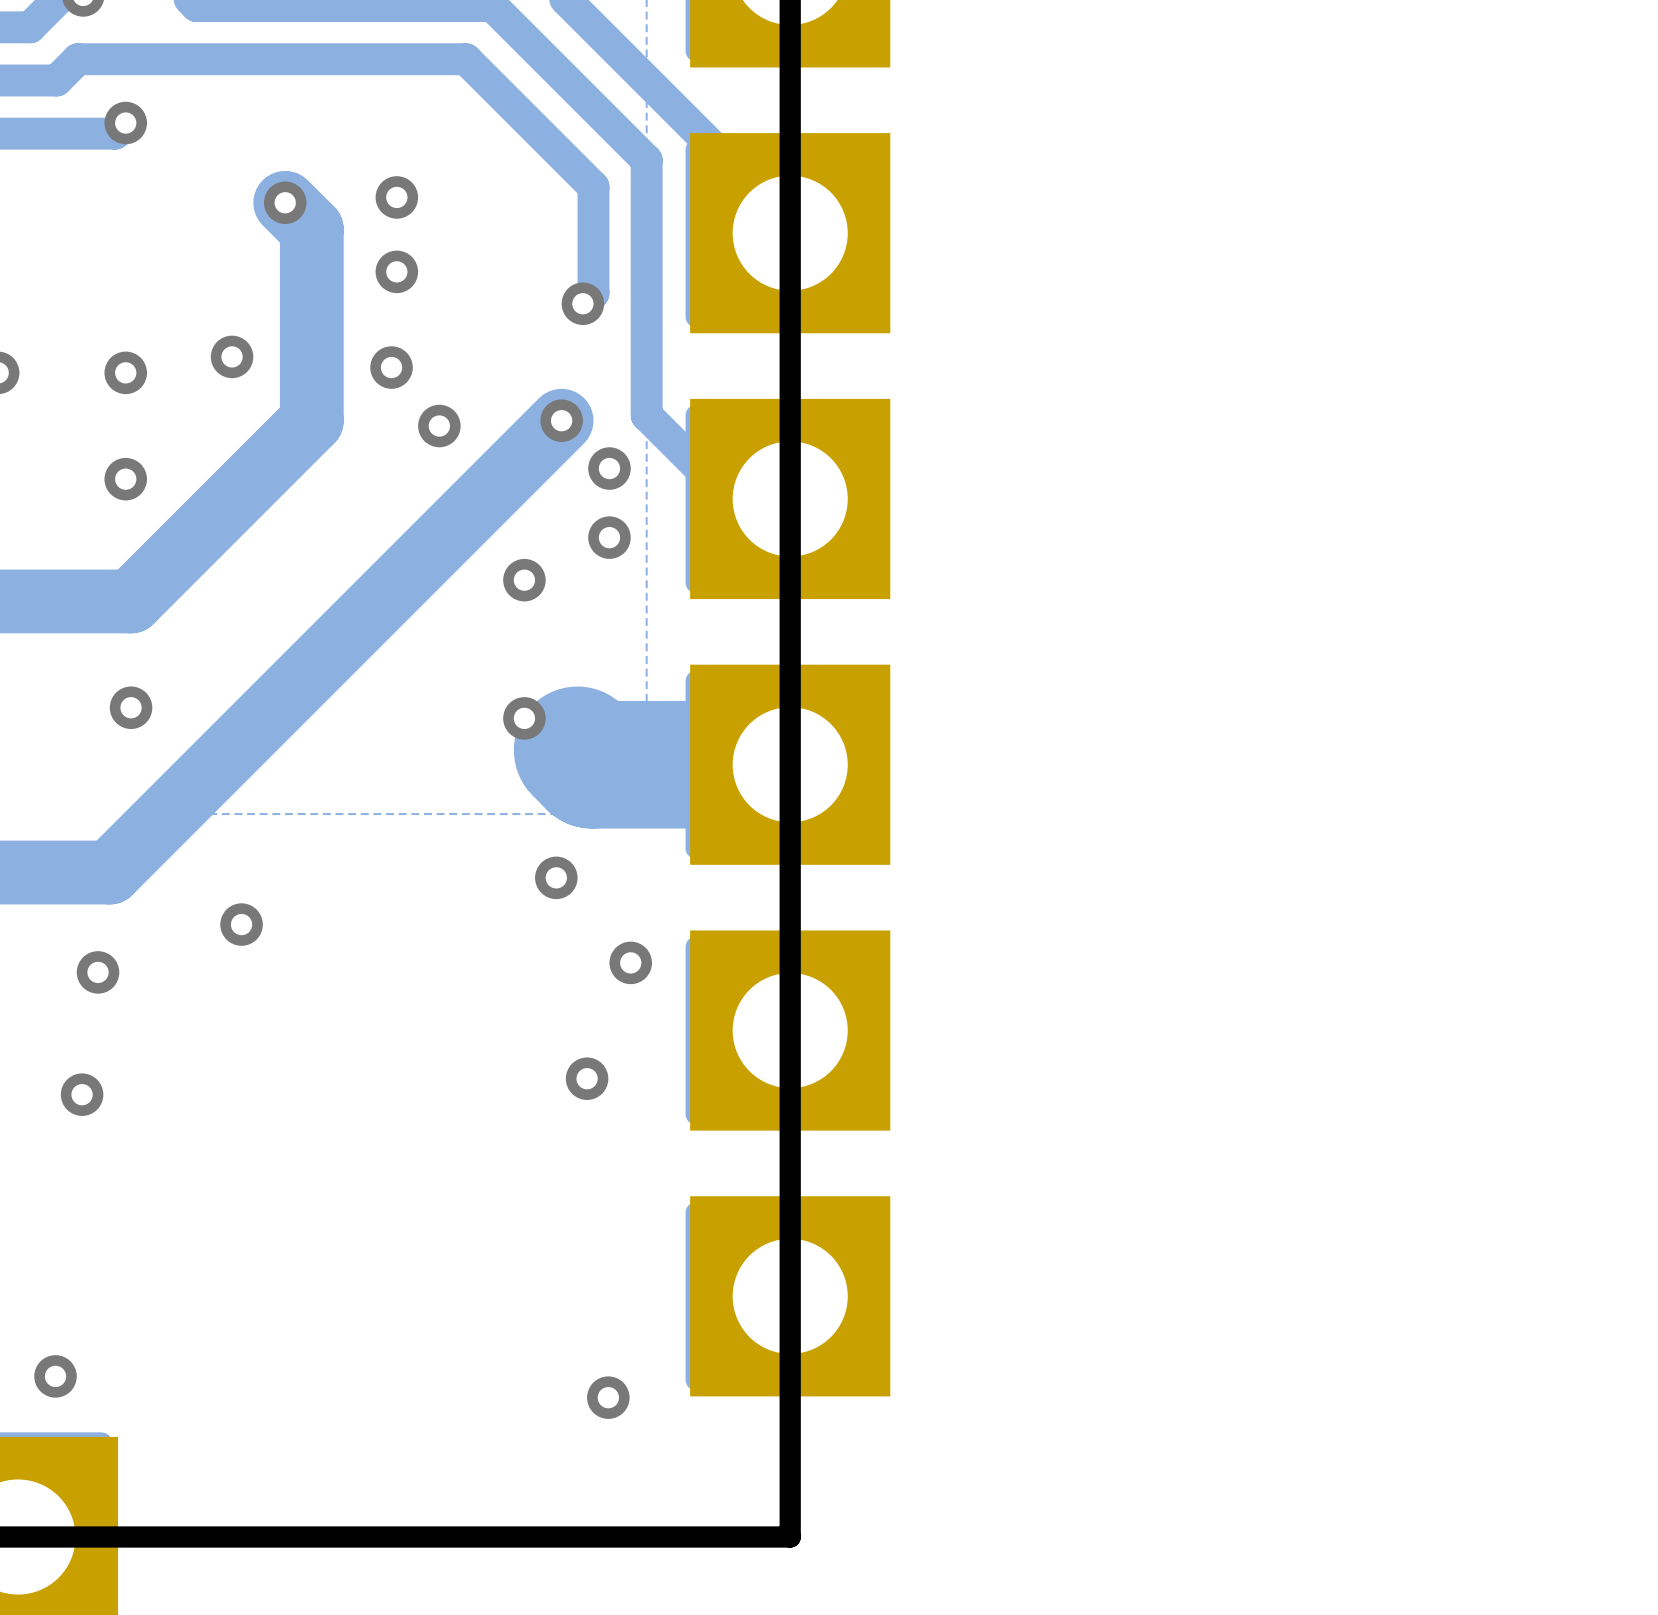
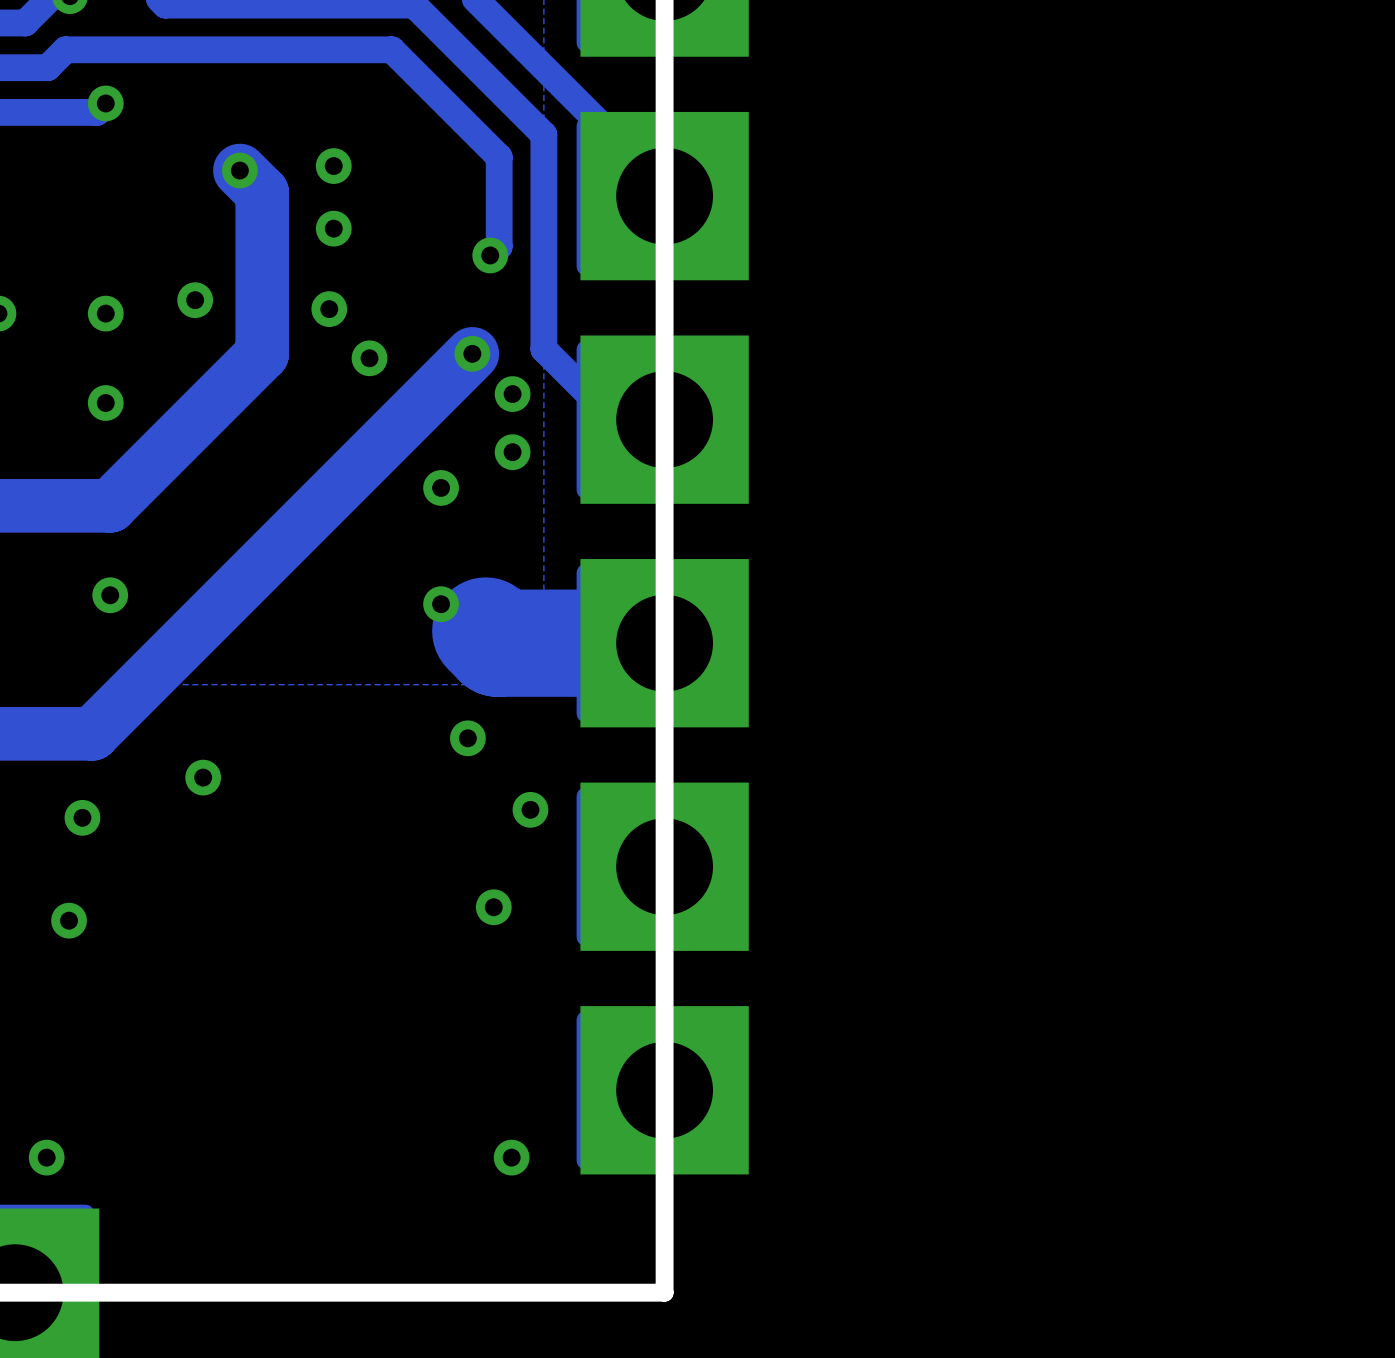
via position: (608, 1397) -> (511, 1157)

